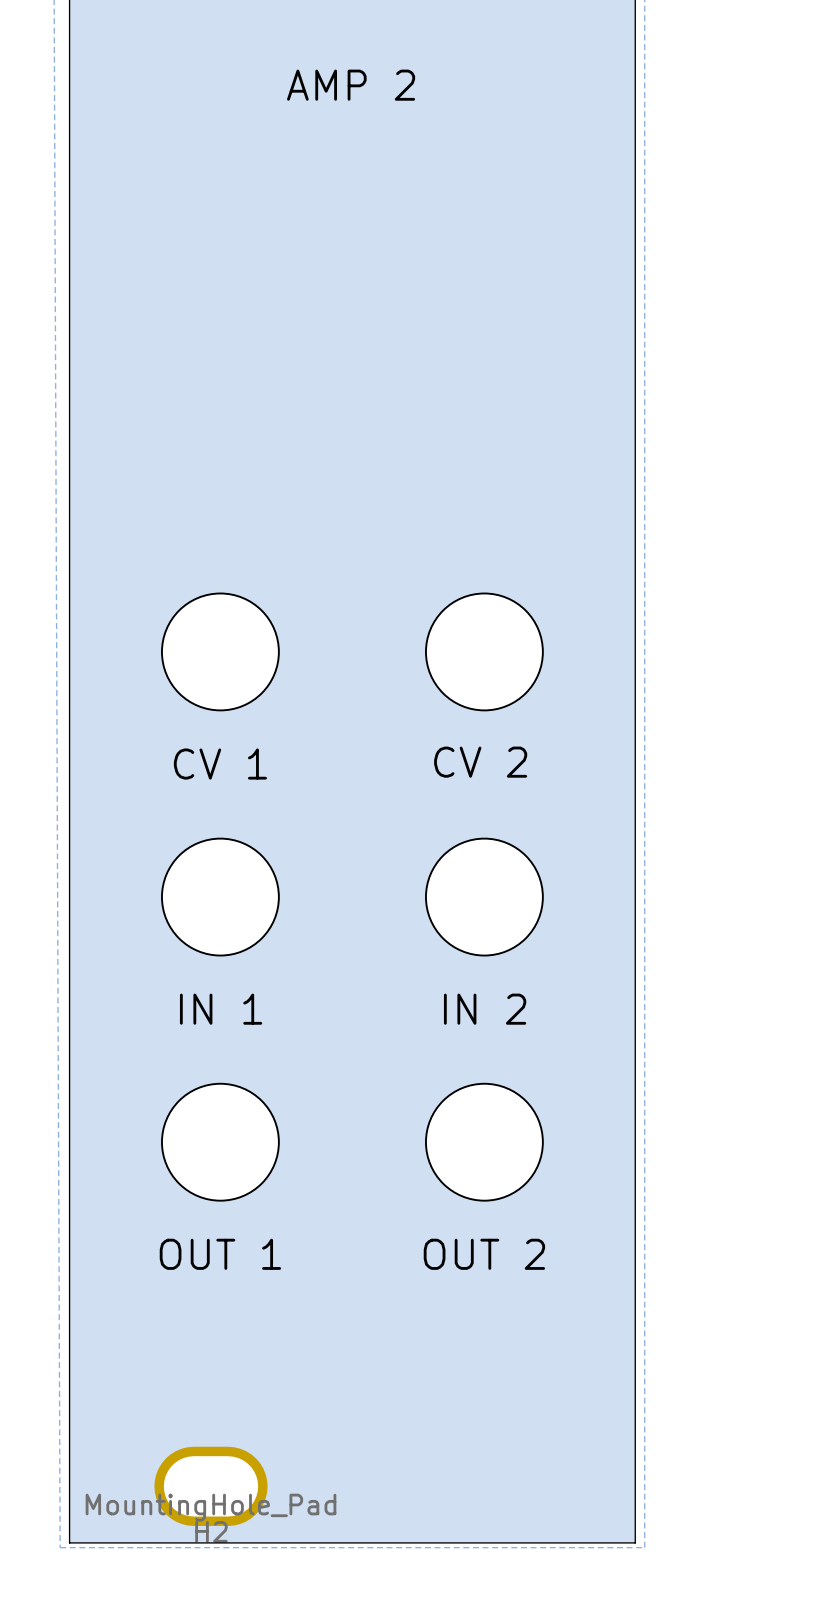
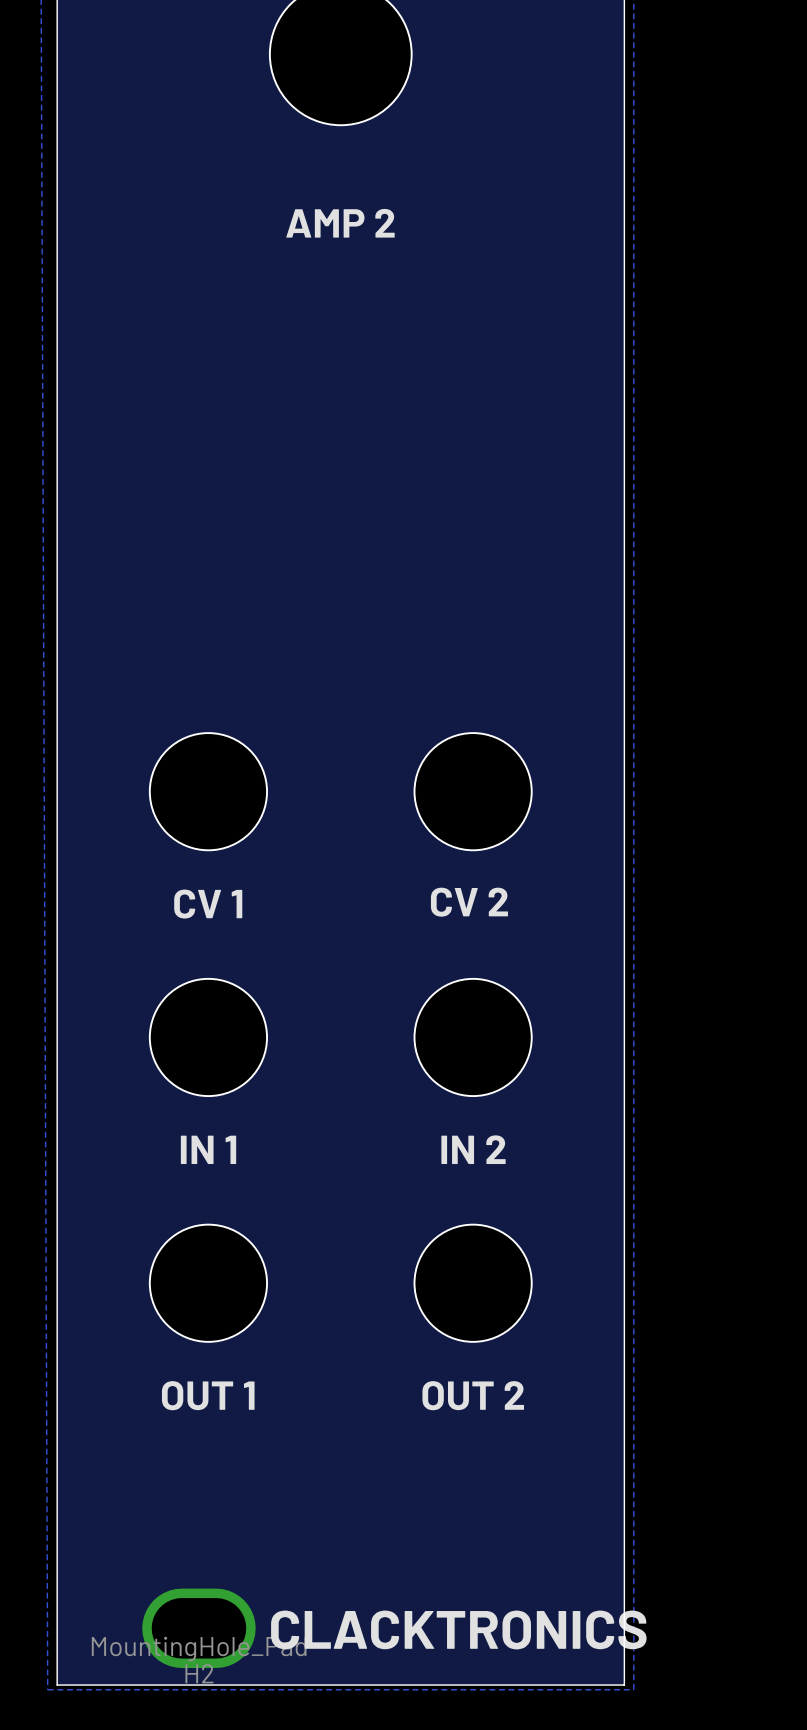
text: none -> CLACKTRONICS (458, 1629)

